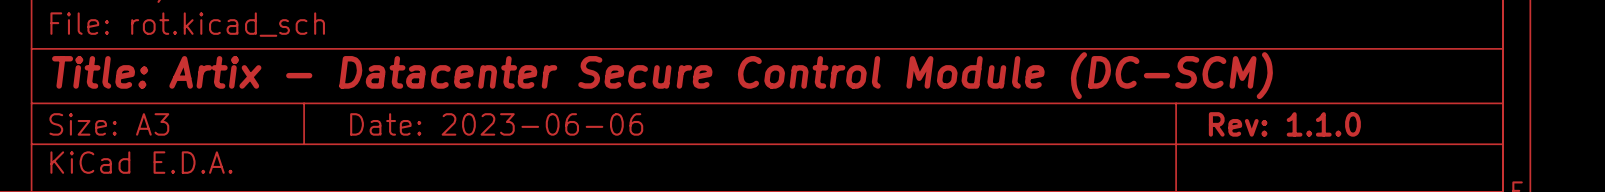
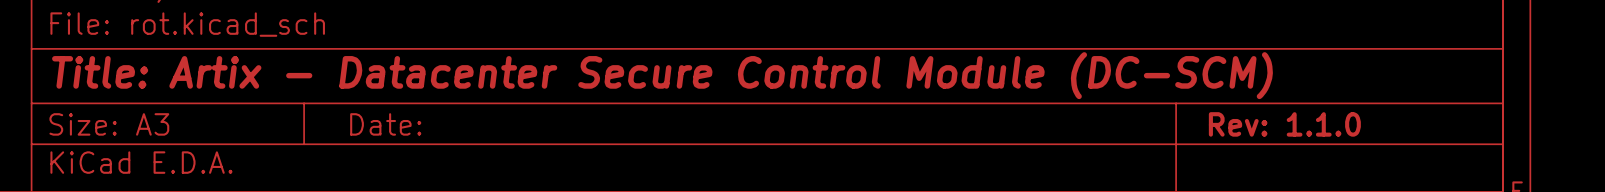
title block: Date: 2023-06-06 (496, 124) -> Date: (385, 124)

